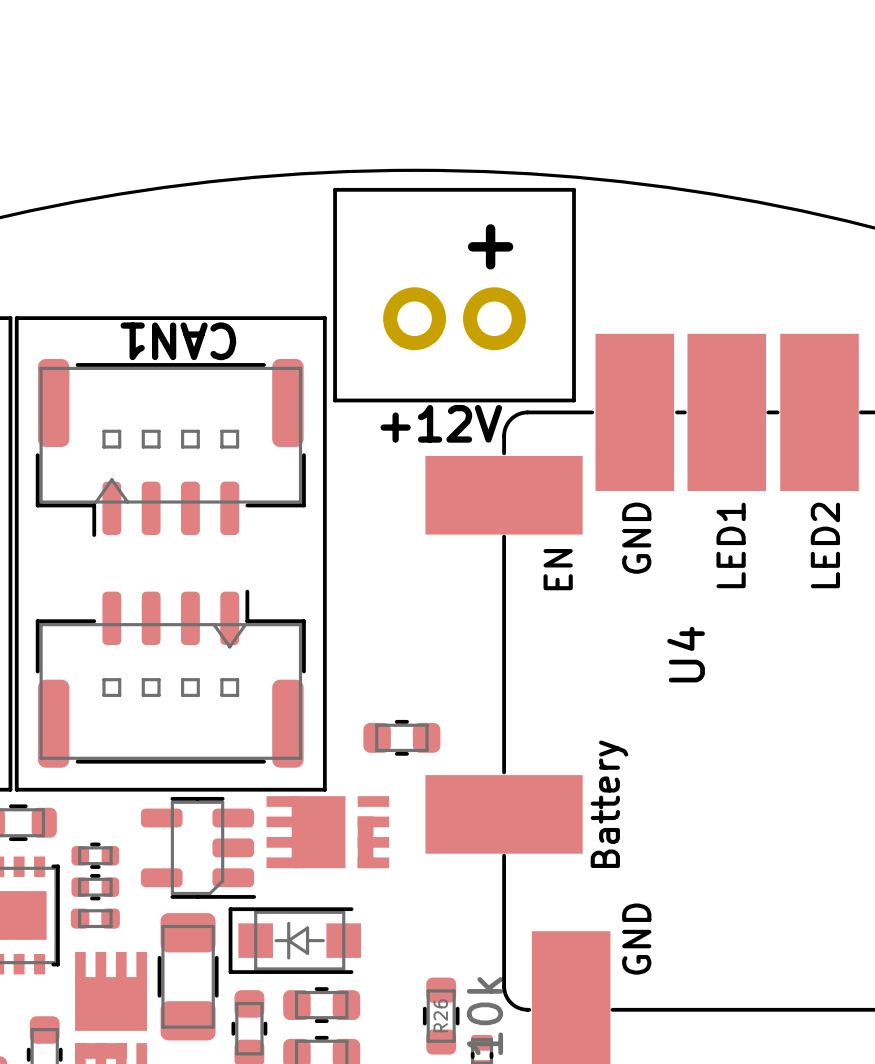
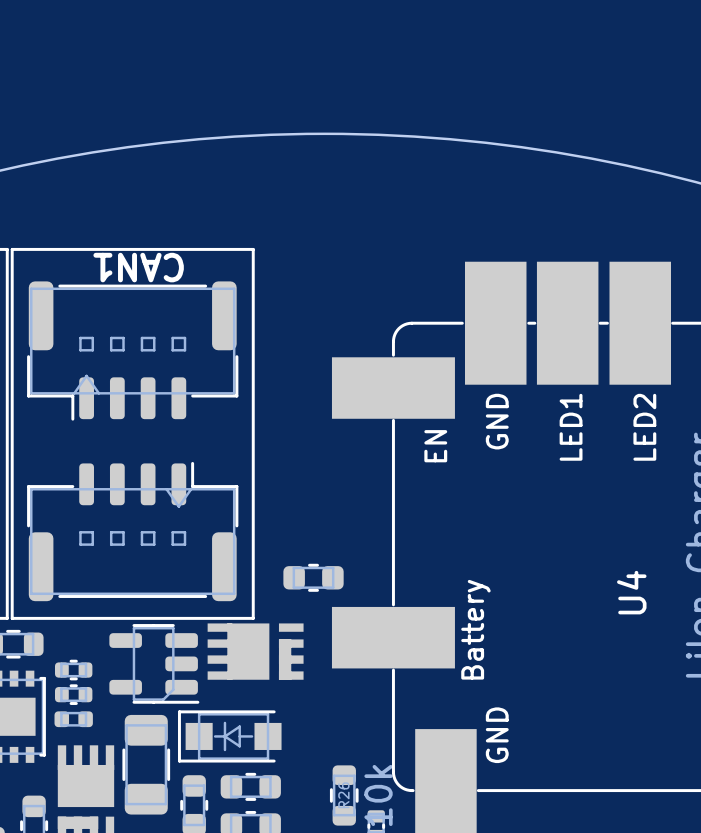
text: + (490, 246) -> none
part: (454, 295) -> none
text: +12V (441, 423) -> none
U4 name position: U4 (686, 654) -> U4 (631, 592)

